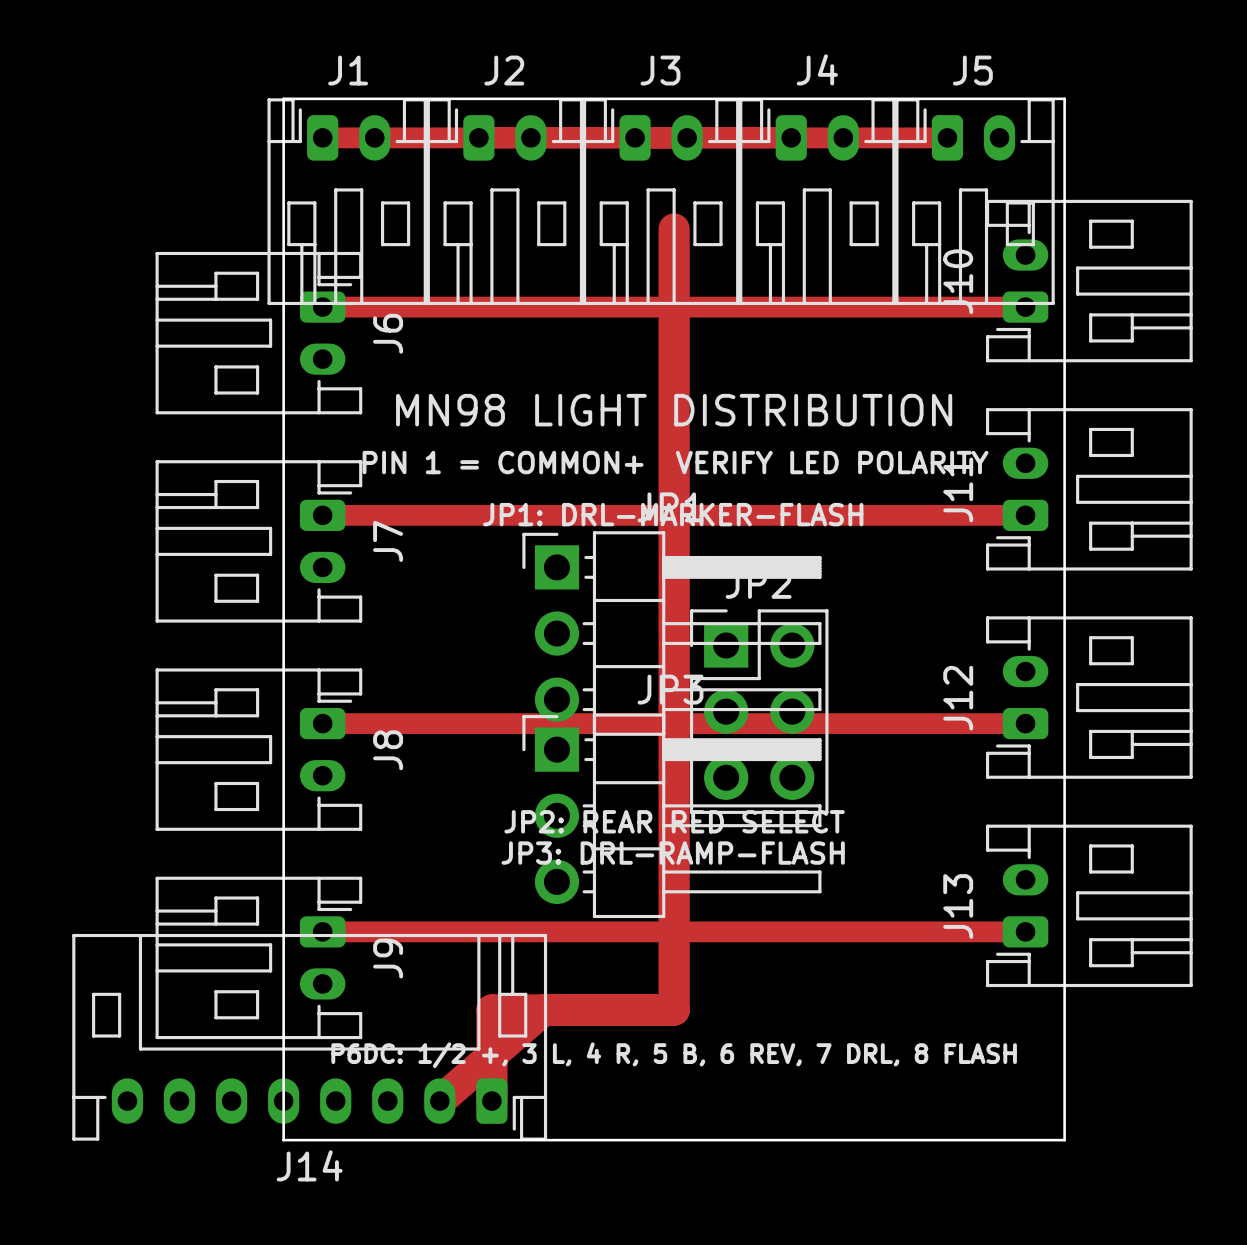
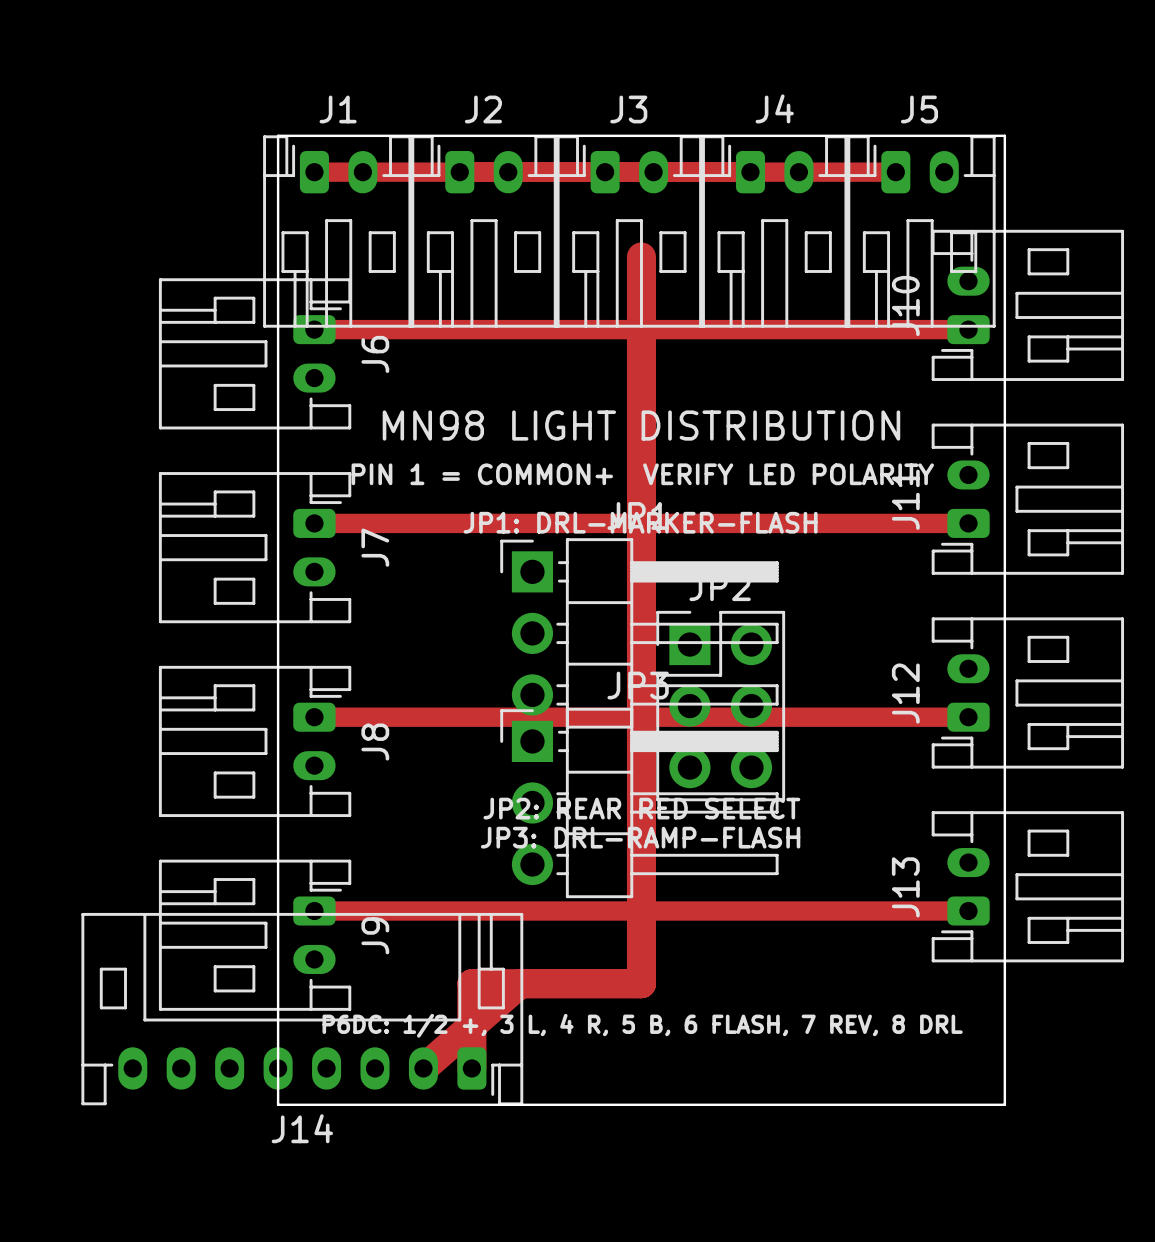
text: P6DC: 1/2 +, 3 L, 4 R, 5 B, 6 REV, 7 DRL, 8 FLASH (674, 1055) -> P6DC: 1/2 +, 3 L, 4 R, 5 B, 6 FLASH, 7 REV, 8 DRL (642, 1025)

